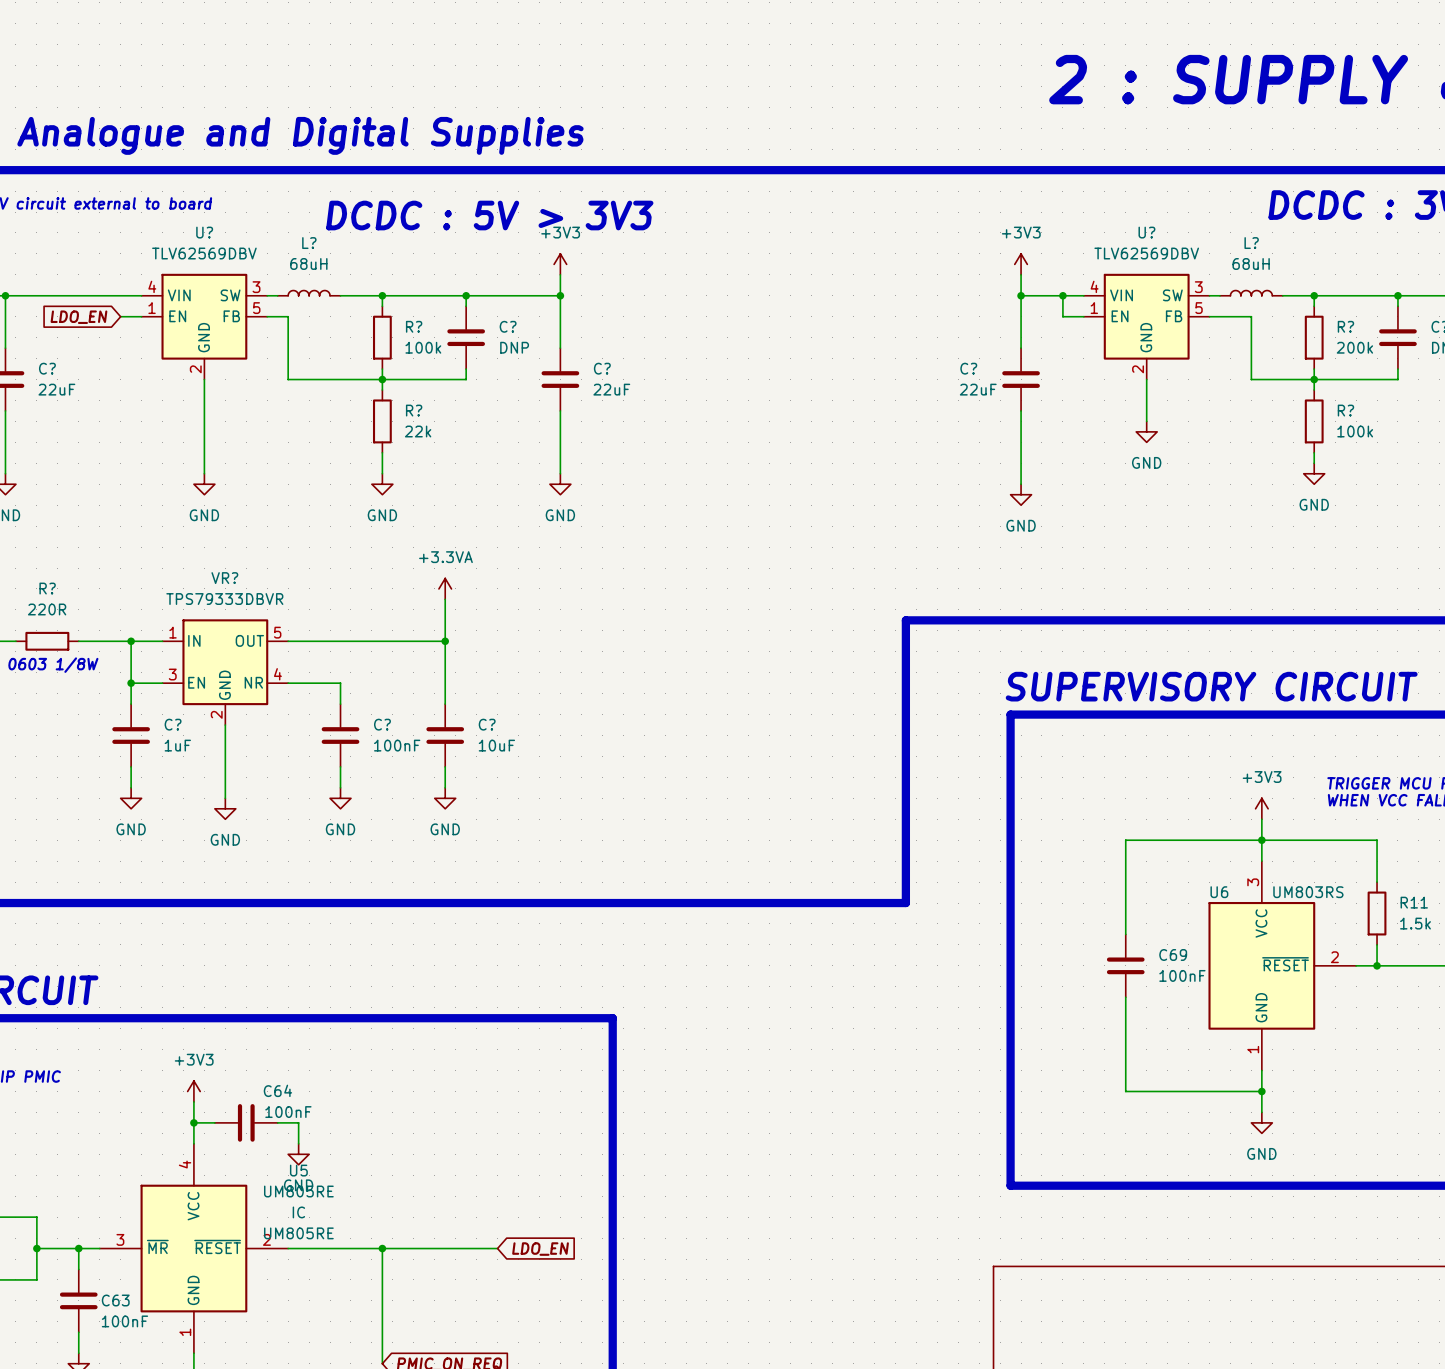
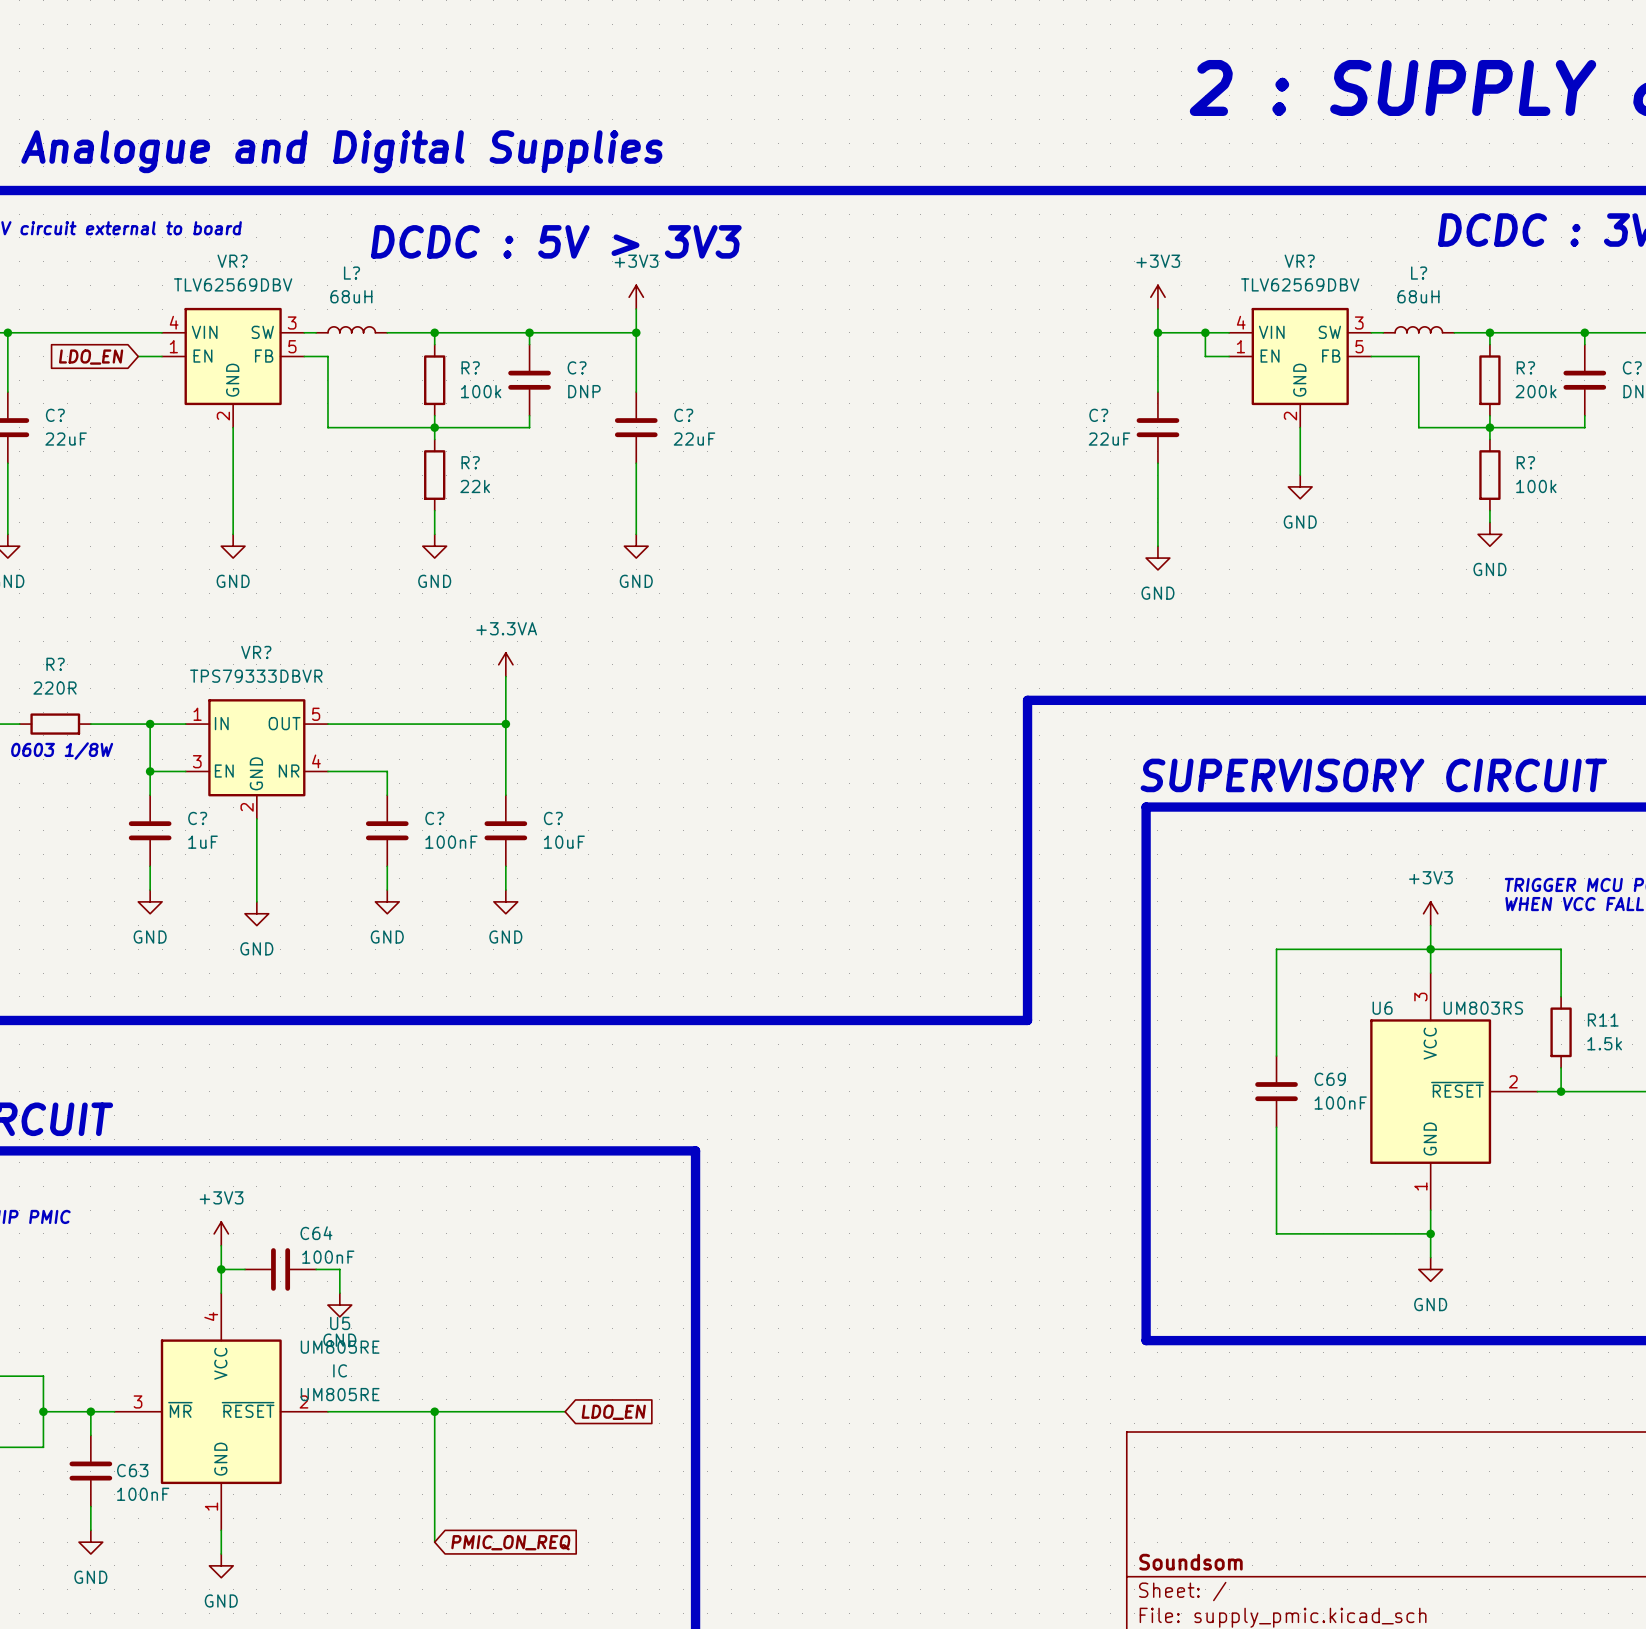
U? name: U? (204, 232) -> VR? (232, 261)
U? name: U? (1146, 232) -> VR? (1299, 261)

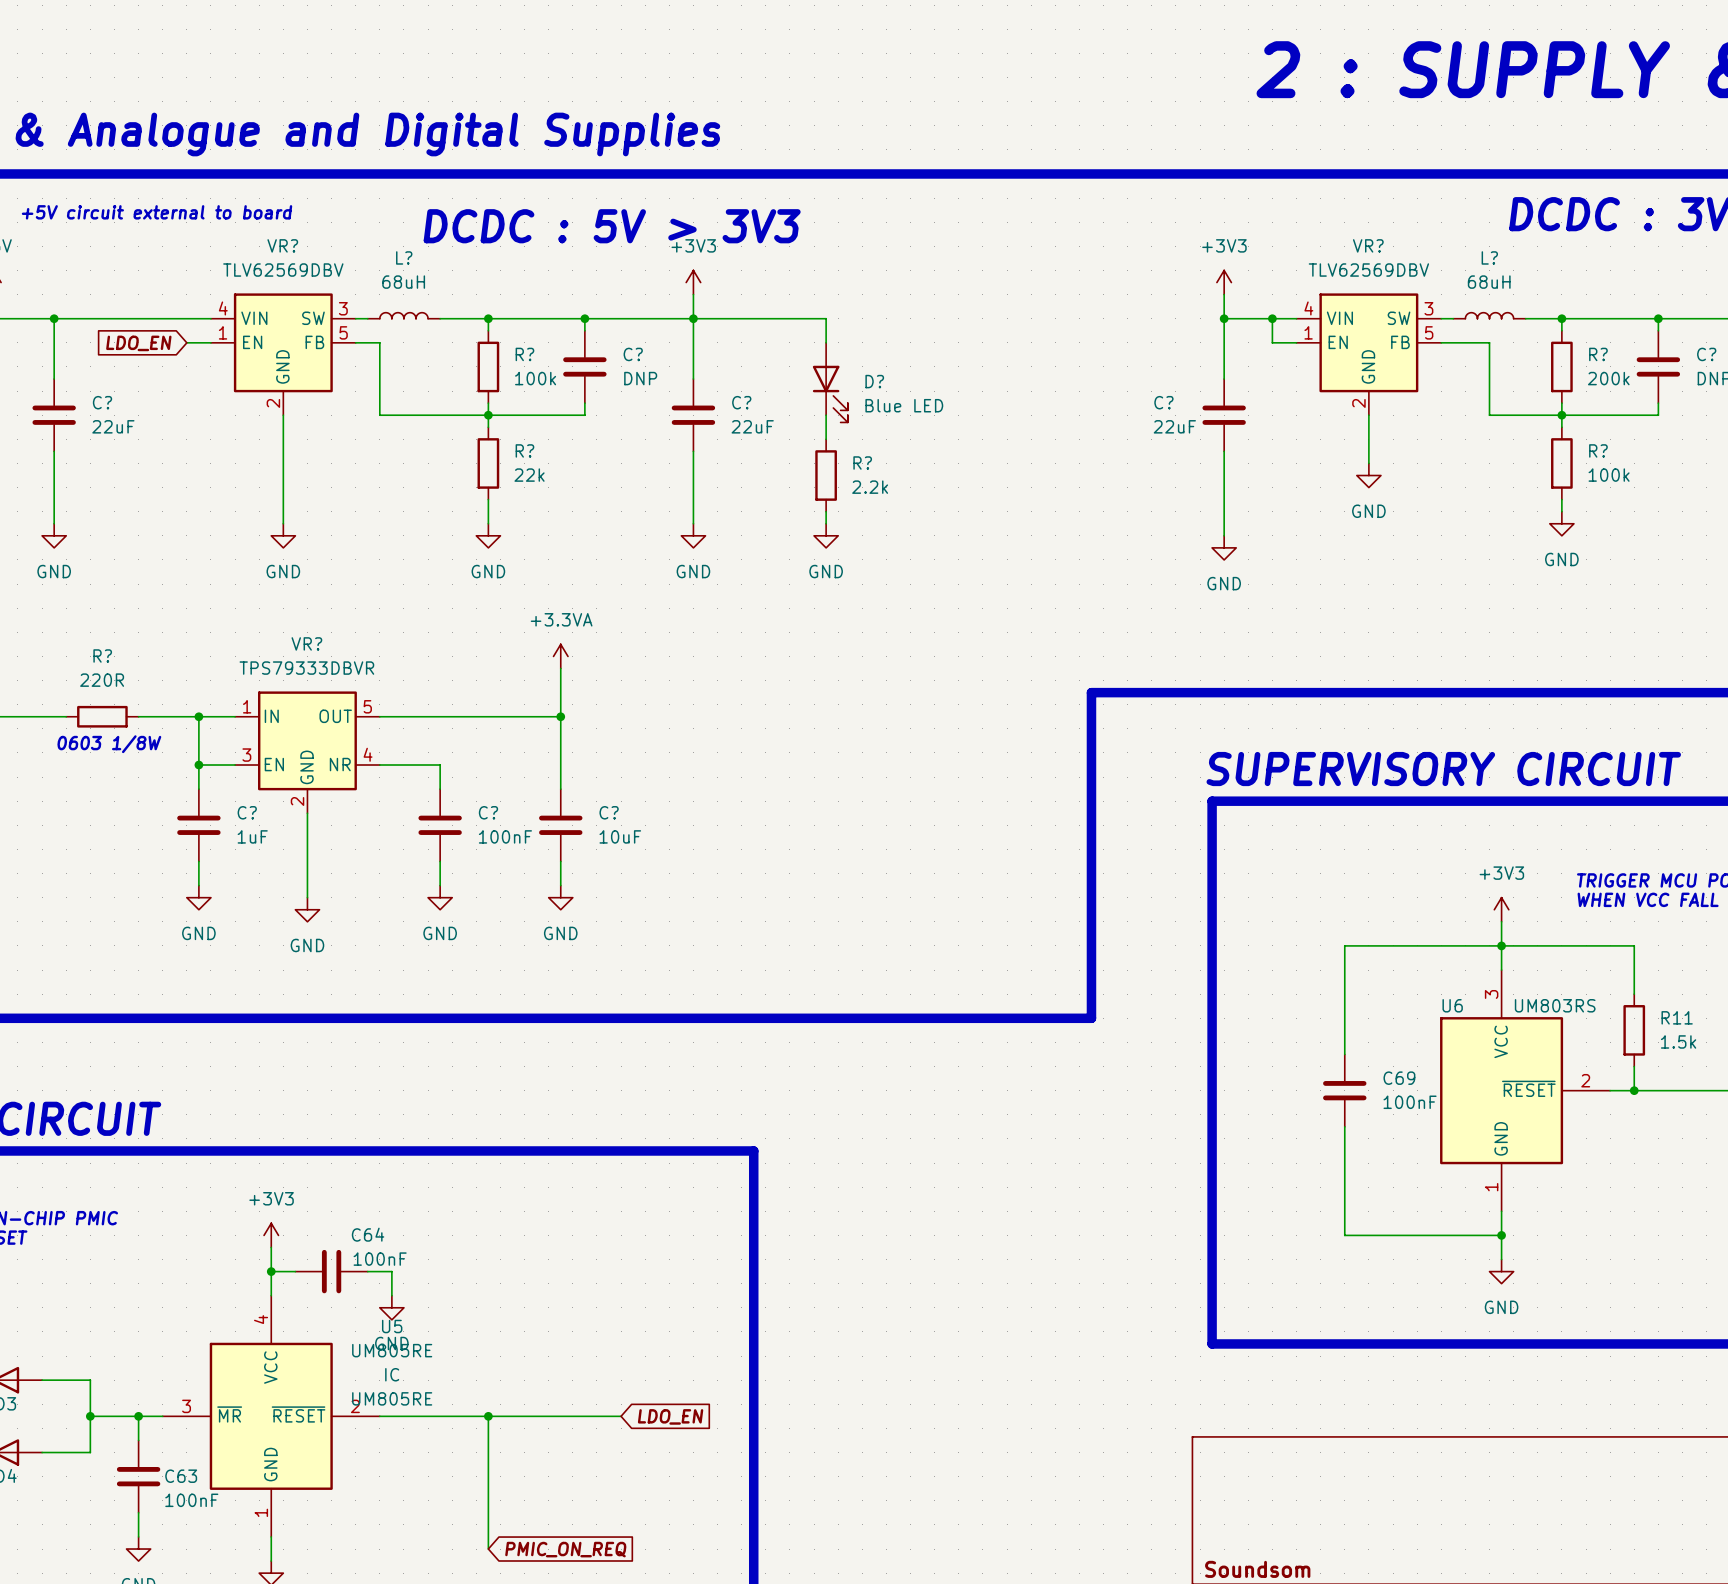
wire: none -> (693, 318) (826, 318) (826, 342)
D?: none -> Blue LED (830, 382)
wire: none -> (826, 415) (826, 439)
R?: none -> 2.2k (826, 475)
wire: none -> (826, 511) (826, 523)
power symbol: none -> GND (826, 535)

